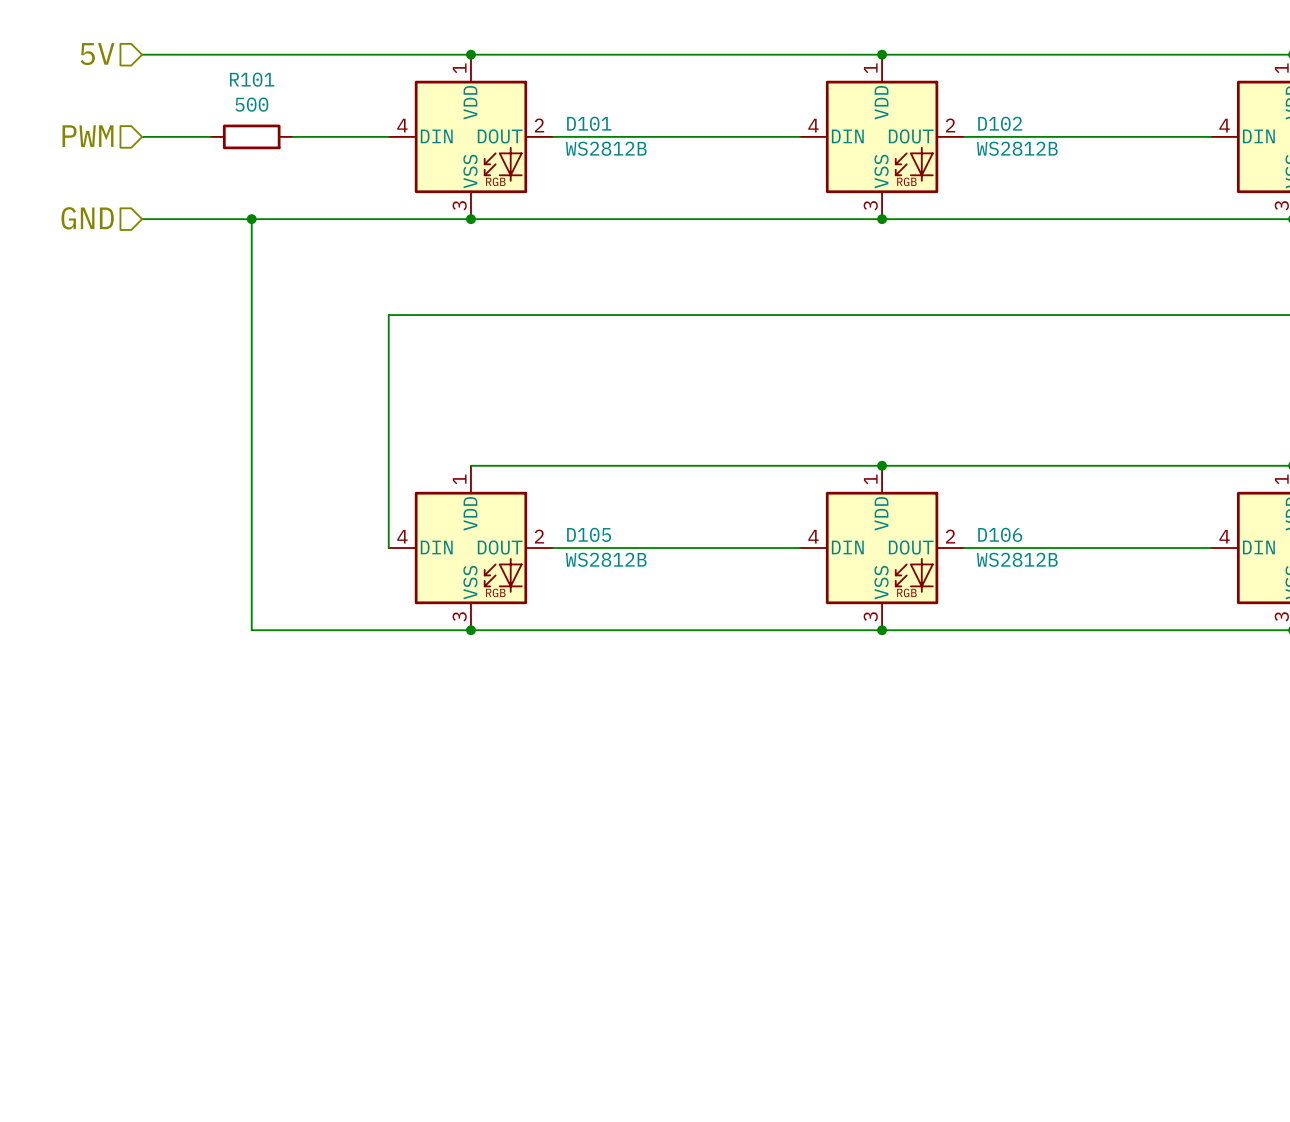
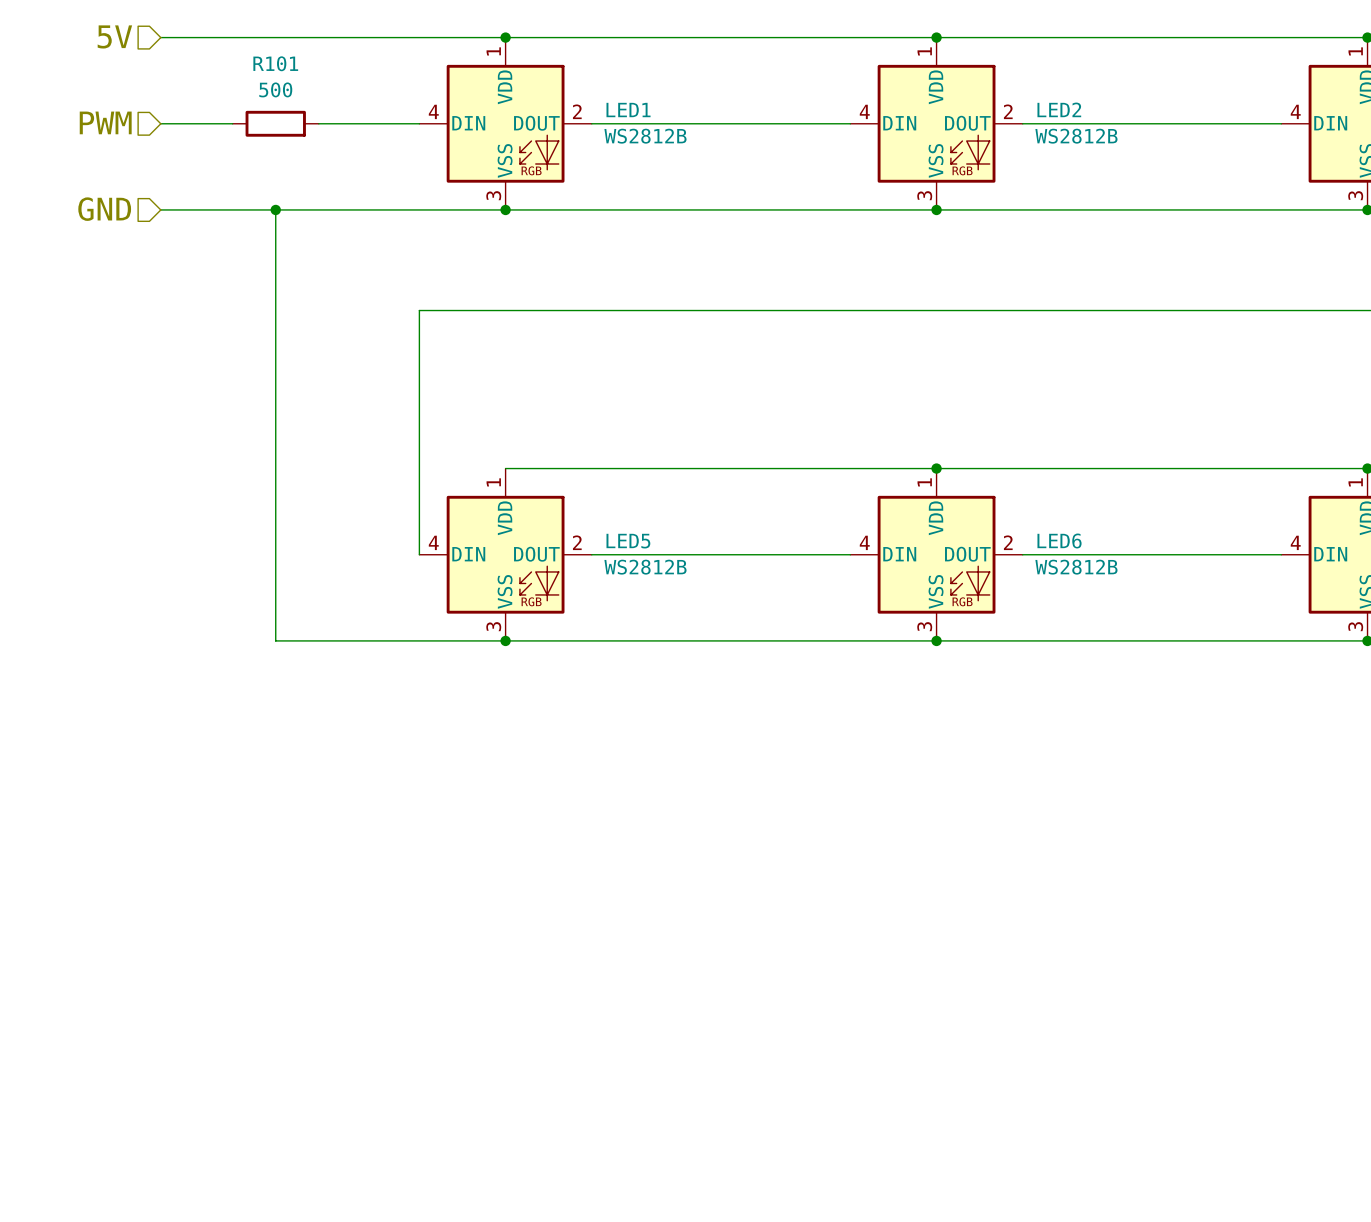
D101 name: D101 (589, 123) -> LED1 (628, 110)
D102 name: D102 (1000, 123) -> LED2 (1059, 109)
D105 name: D105 (589, 534) -> LED5 (628, 541)
D106 name: D106 (1000, 534) -> LED6 (1059, 541)

